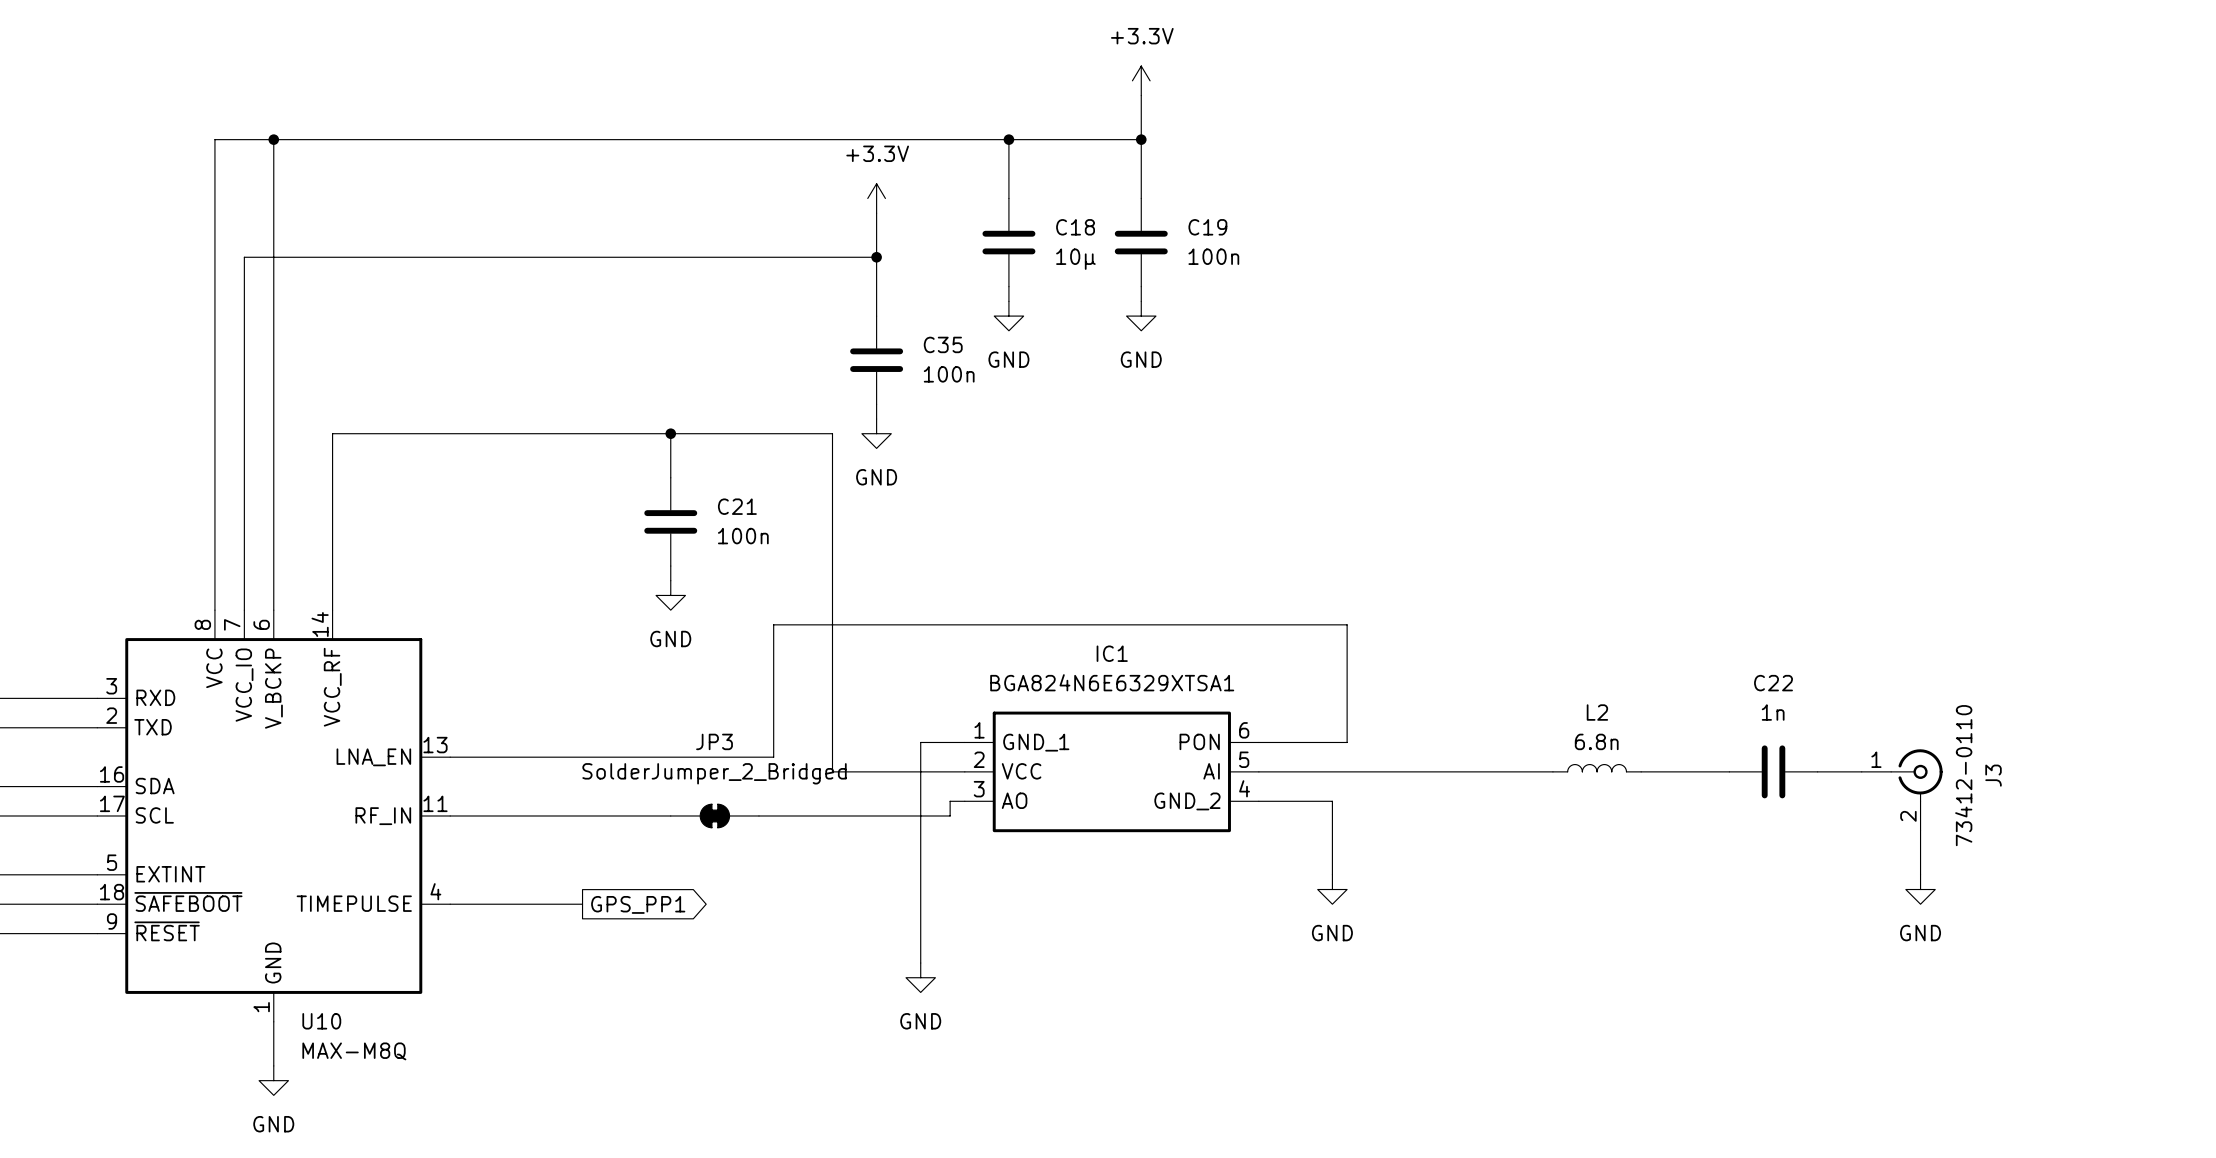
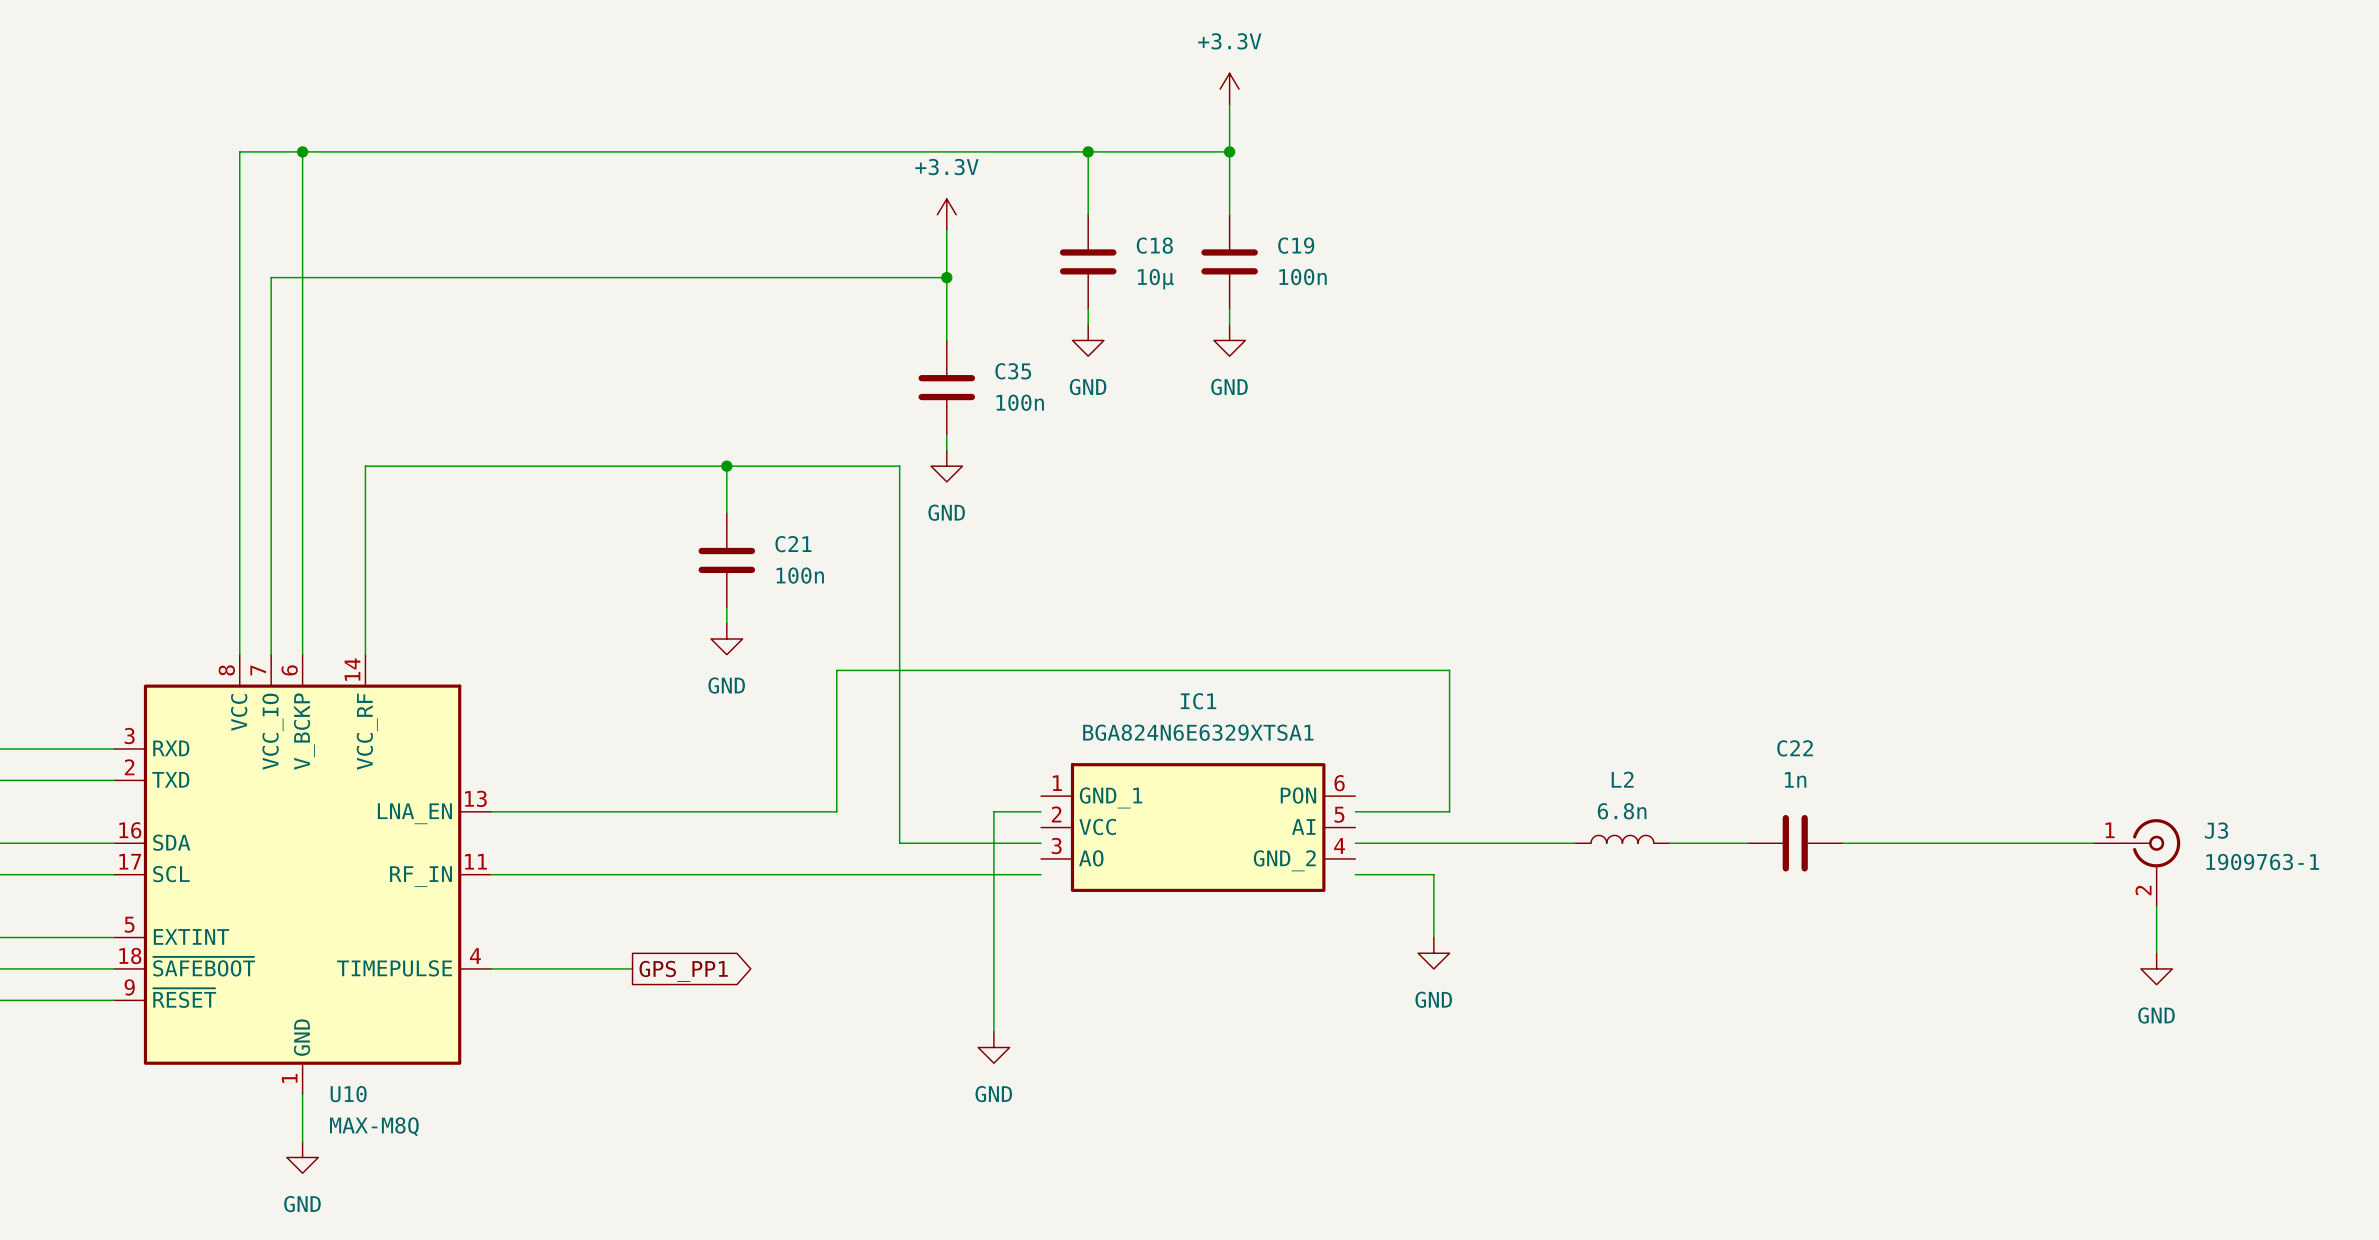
wire: (964, 742) (920, 742) (920, 757) -> (1041, 811) (993, 811)
wire: (1258, 742) (1347, 742) -> (1355, 811) (1449, 811) (1449, 796)
L2 position: (1597, 768) -> (1622, 839)
wire: (832, 771) (964, 771) -> (899, 827) (899, 843) (1041, 843)
wire: (1258, 771) (1552, 771) -> none
wire: (1641, 771) (1729, 771) -> none
C22 position: (1773, 771) -> (1795, 843)
wire: (1817, 771) (1861, 771) -> none
J3 value: 73412-0110 (1963, 775) -> 1909763-1 (2262, 862)
J3 name rotation: 0° (1993, 775) -> 90° clockwise (2216, 830)
wire: none -> (1355, 843) (1575, 843)
wire: none -> (1669, 843) (1748, 843)
wire: none -> (1842, 843) (2093, 843)
J3 position: (1902, 789) -> (2136, 862)
wire: (964, 801) (950, 801) (950, 815) -> (1041, 874) (1025, 874)
wire: (1258, 801) (1332, 801) (1332, 815) -> (1355, 874) (1433, 874)
JP3: SolderJumper_2_Bridged (714, 815) -> none
wire: (1920, 830) (1920, 874) -> (2156, 906) (2156, 953)
power symbol position: GND (1920, 889) -> GND (2156, 968)

